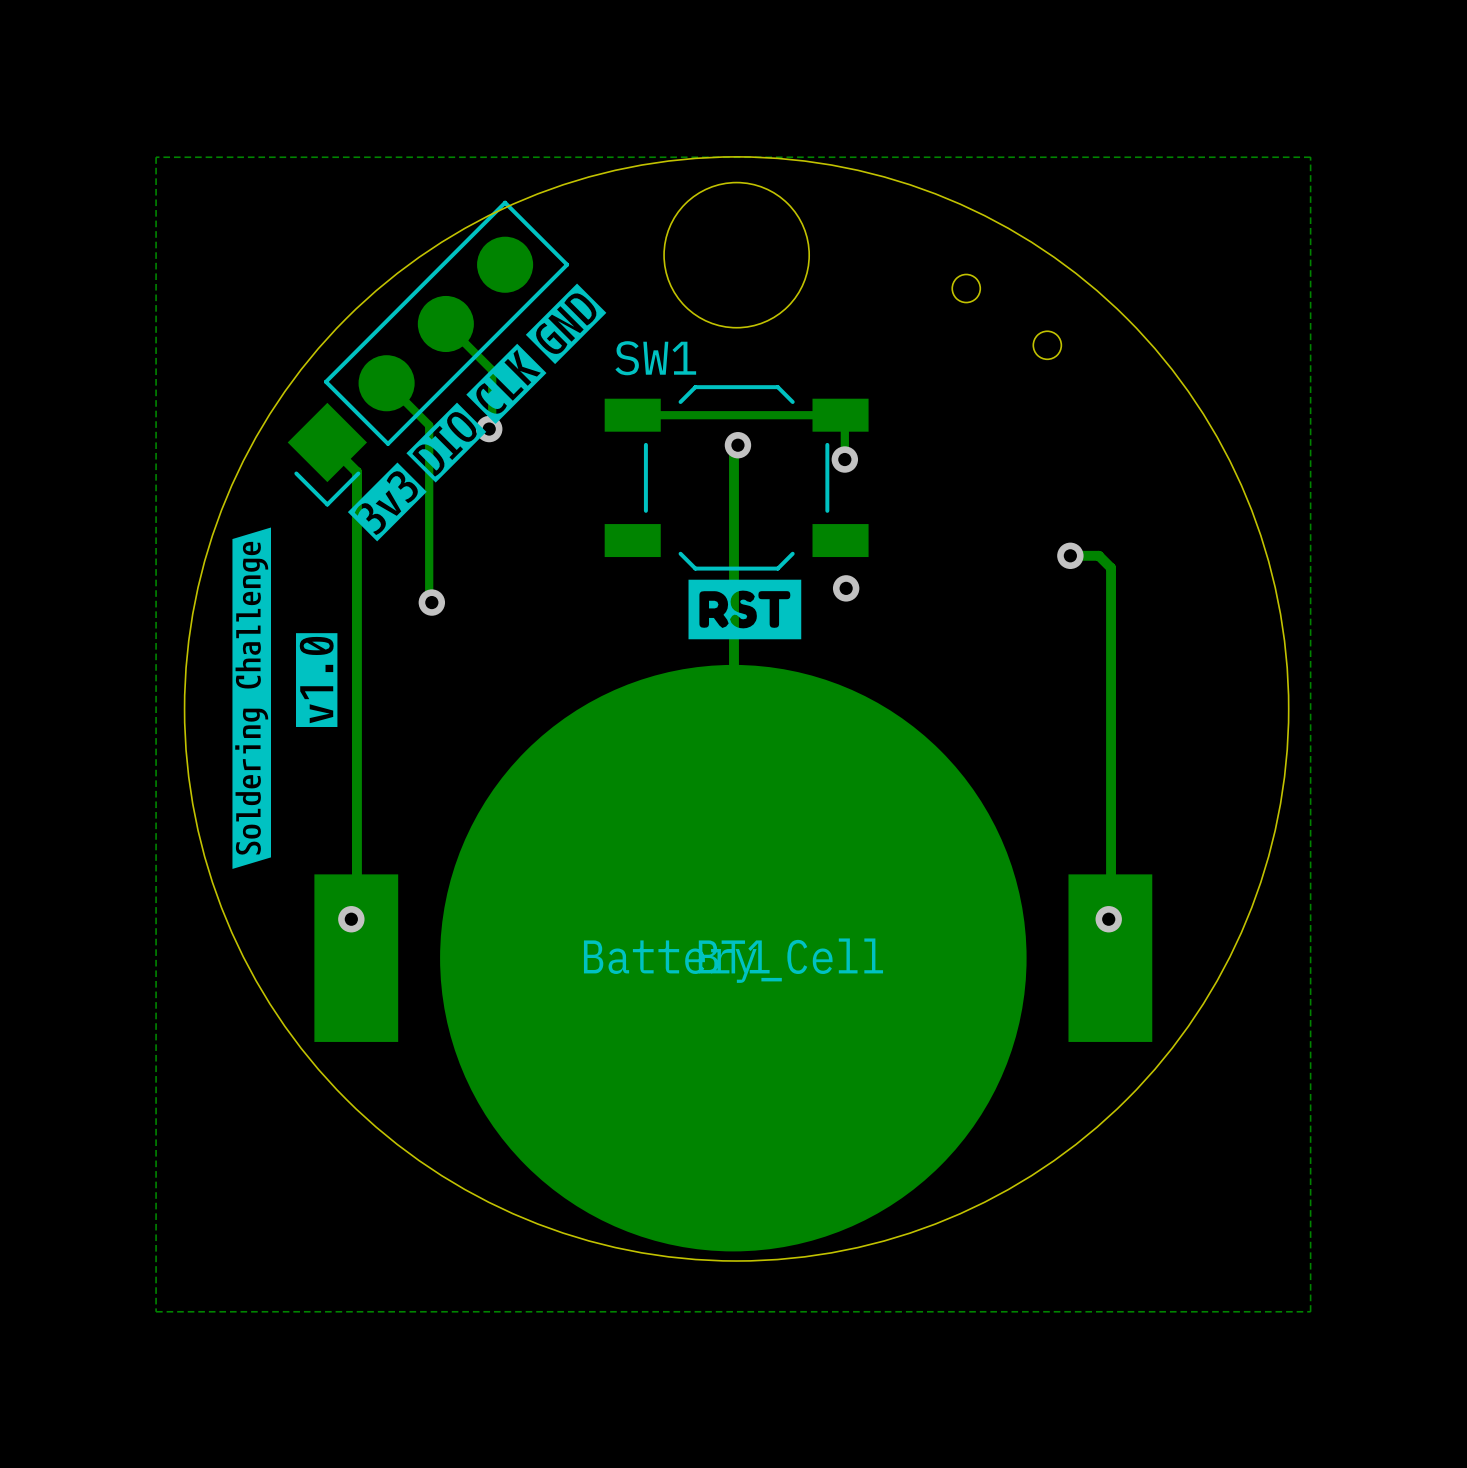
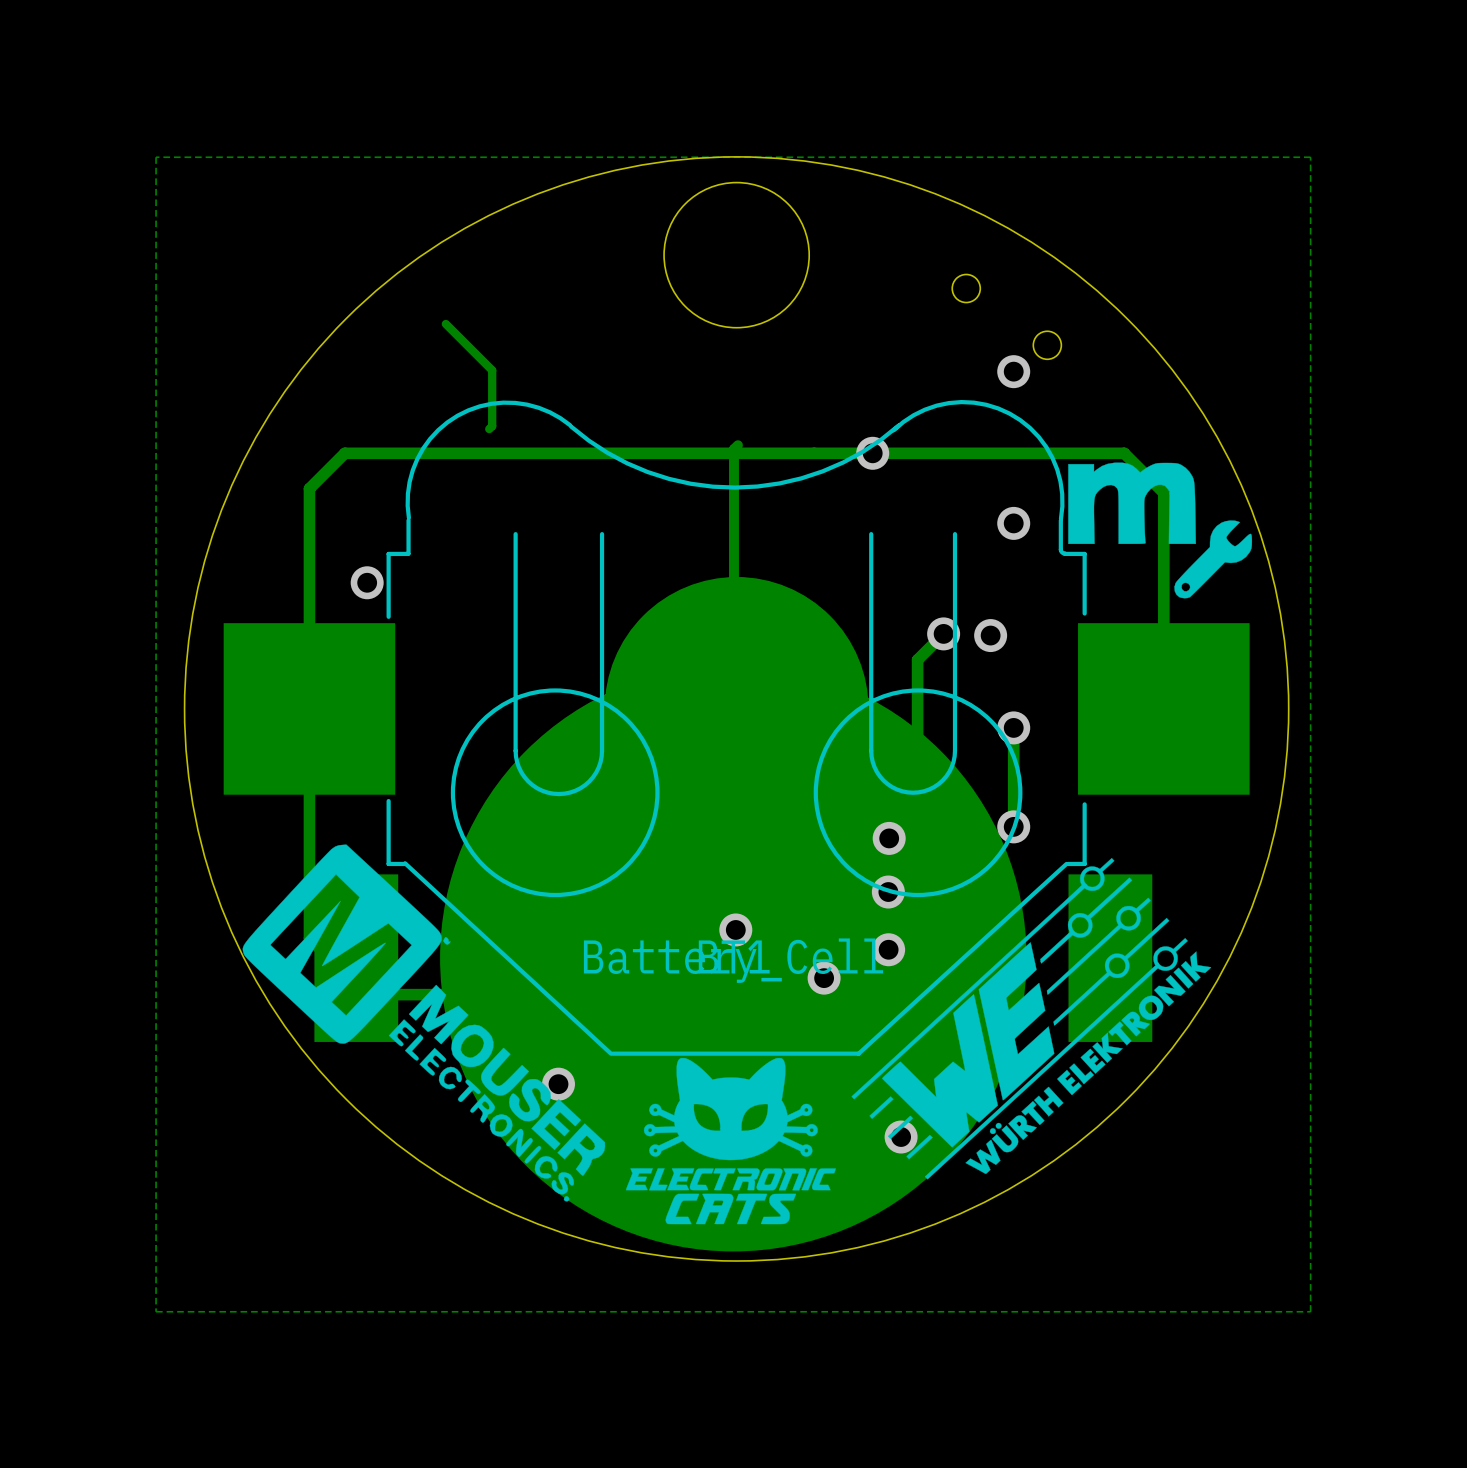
drawing: [347, 283, 607, 542] -> none
part: (428, 353) -> none
via: none -> (1013, 371)
track: (387, 383) (429, 425) (429, 599) (431, 602) -> none
track: (632, 415) (840, 415) (844, 419) (844, 459) -> none
via: (489, 429) -> none
track: (327, 442) (356, 472) (356, 958) (356, 924) (351, 919) -> none
via: (737, 445) -> none
via position: (844, 459) -> (872, 453)
drawing: none -> [1068, 462, 1253, 599]
SW1: (736, 477) -> none
via: none -> (1013, 523)
drawing: [232, 527, 338, 869] -> none
track: (1070, 555) (1098, 555) (1111, 567) (1110, 958) -> none
via: (1070, 555) -> none
drawing: [688, 579, 802, 640] -> none
via: none -> (367, 582)
via: (846, 588) -> none
via: (431, 602) -> none
track: none -> (943, 633) (917, 659) (917, 824)
via: none -> (943, 633)
via: none -> (990, 635)
track: none -> (1163, 708) (1163, 492) (1124, 453) (344, 453) (309, 488) (309, 938) (365, 994) (807, 994) (824, 978)
part: none -> (736, 727)
track: none -> (1013, 727) (1013, 826)
via: none -> (1013, 727)
via: none -> (1013, 826)
via: none -> (889, 838)
drawing: none -> [242, 844, 1212, 1225]
via: none -> (888, 892)
via: (351, 919) -> none
via: (1108, 919) -> none
via: none -> (735, 929)
via: none -> (888, 949)
via: none -> (824, 978)
via: none -> (558, 1084)
via: none -> (901, 1137)

